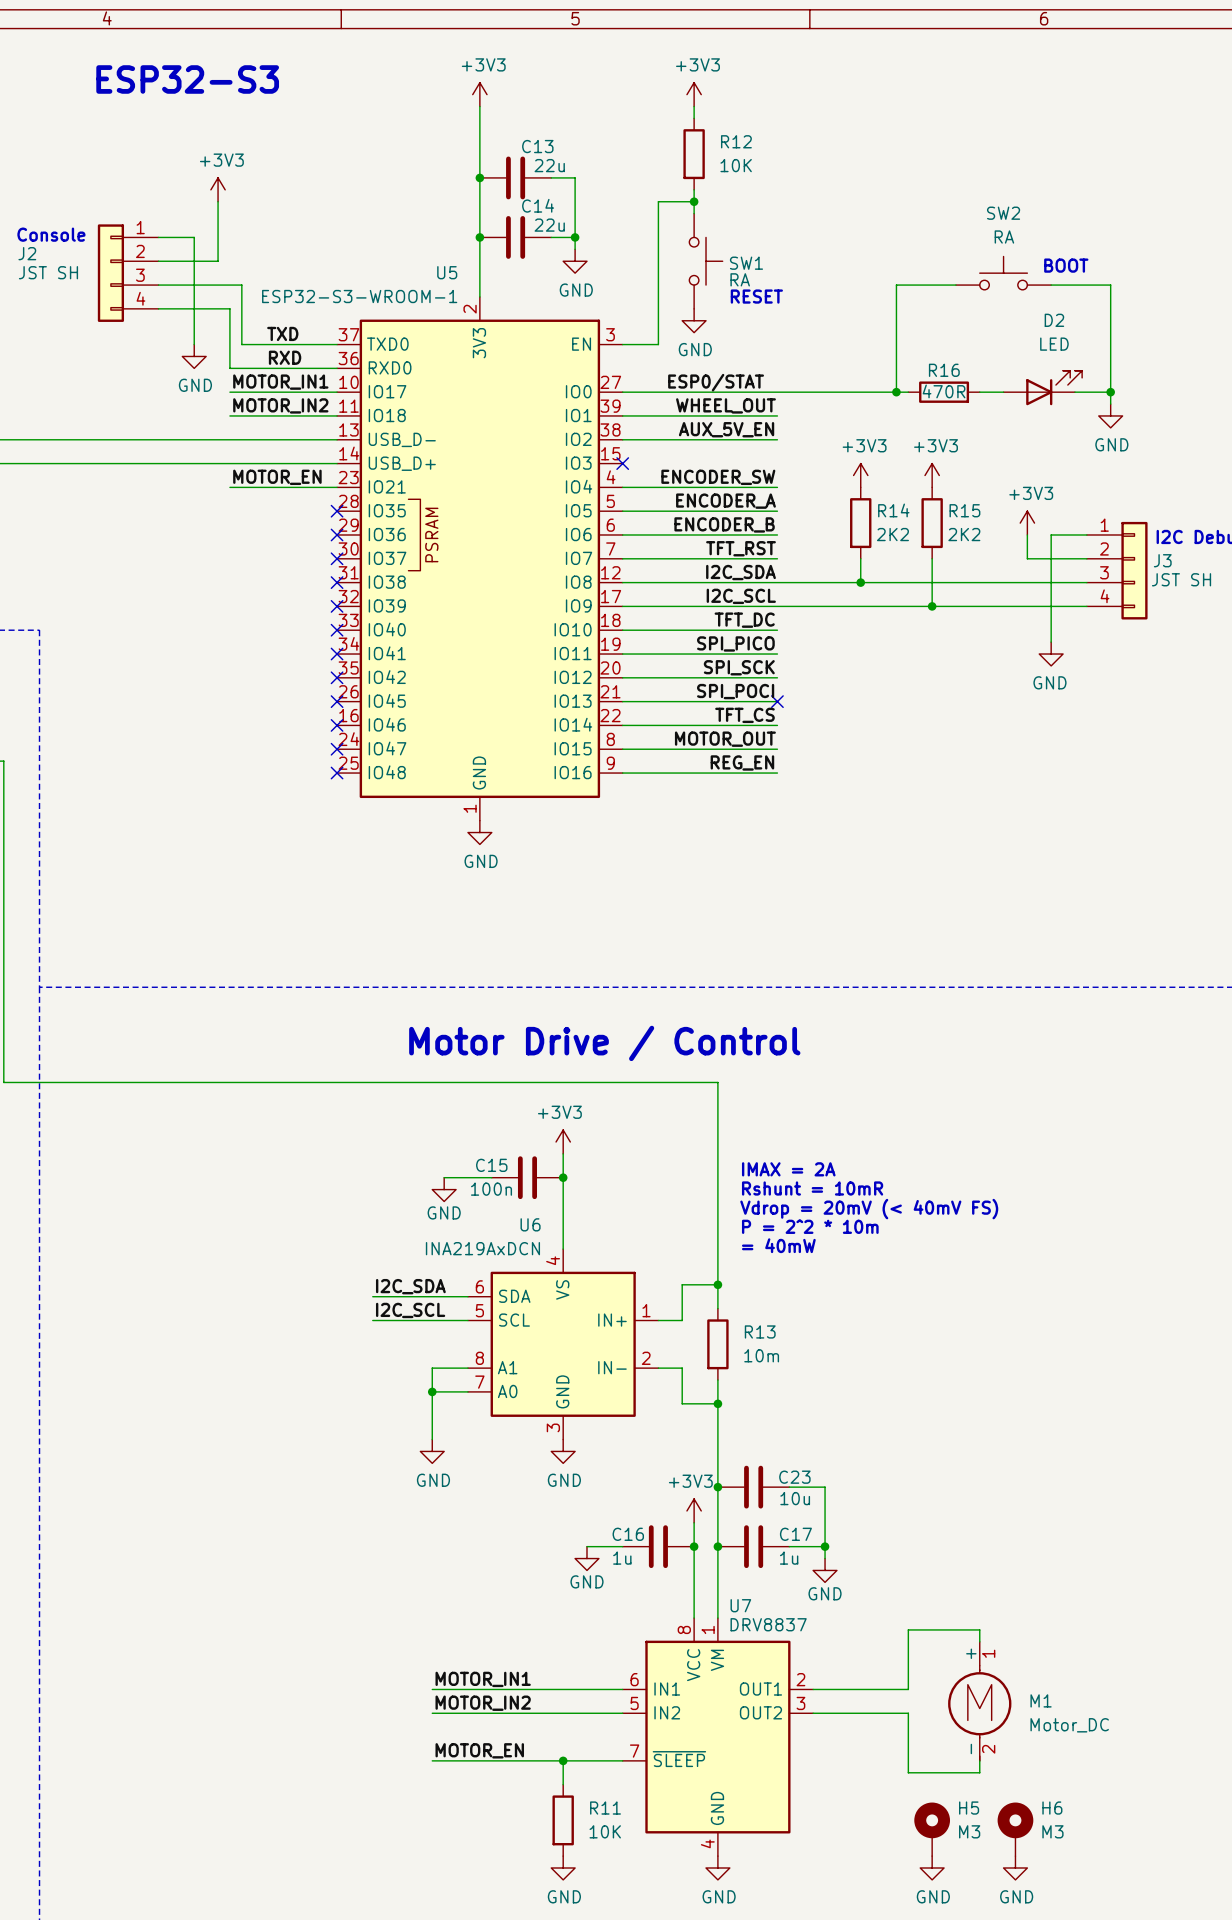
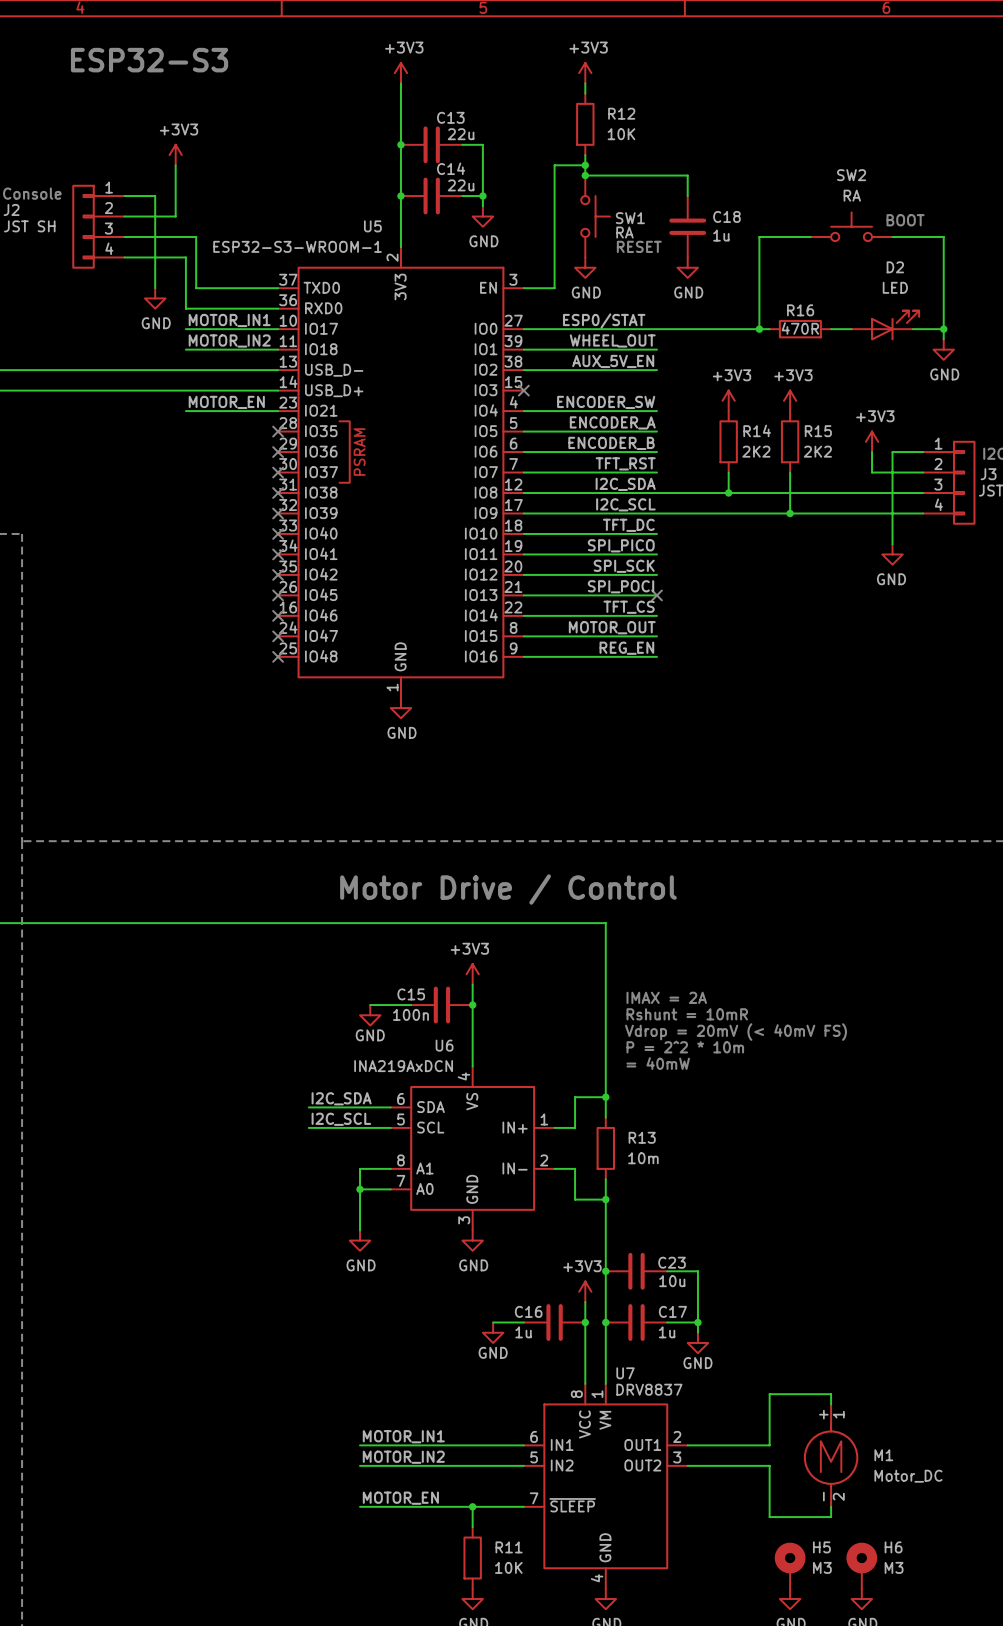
wire: none -> (585, 175) (687, 175) (687, 196)
junction: none -> (585, 175)
C18: none -> 1u (687, 226)
power symbol: none -> GND (687, 267)
label: TXD (282, 333) -> none
label: RXD (285, 357) -> none

